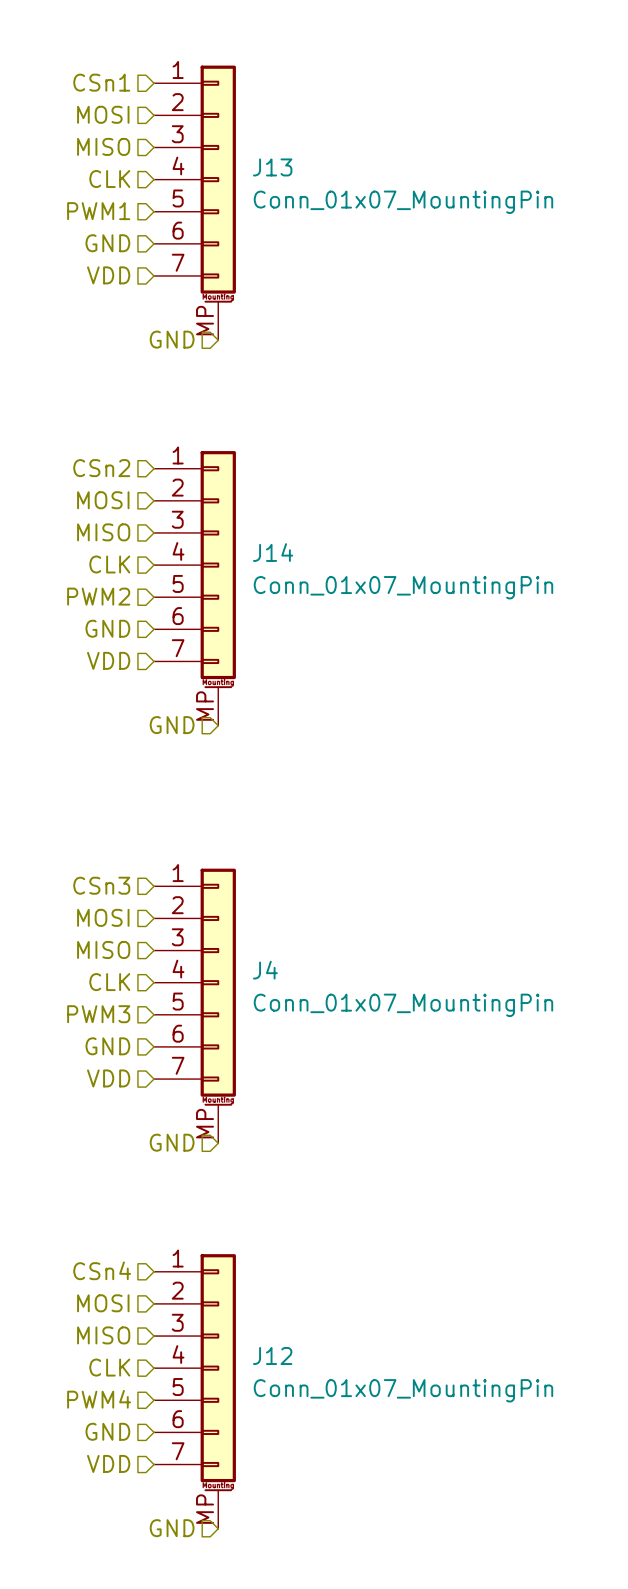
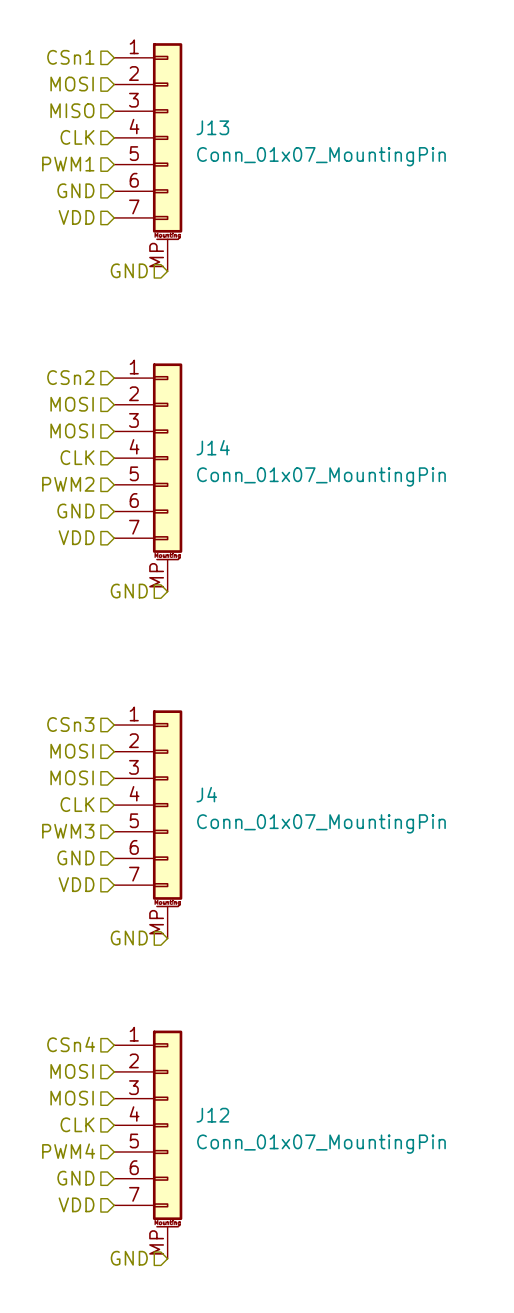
hierarchical label: MISO (103, 532) -> MOSI (72, 430)
hierarchical label: MISO (103, 949) -> MOSI (72, 777)
hierarchical label: MISO (103, 1335) -> MOSI (72, 1098)

